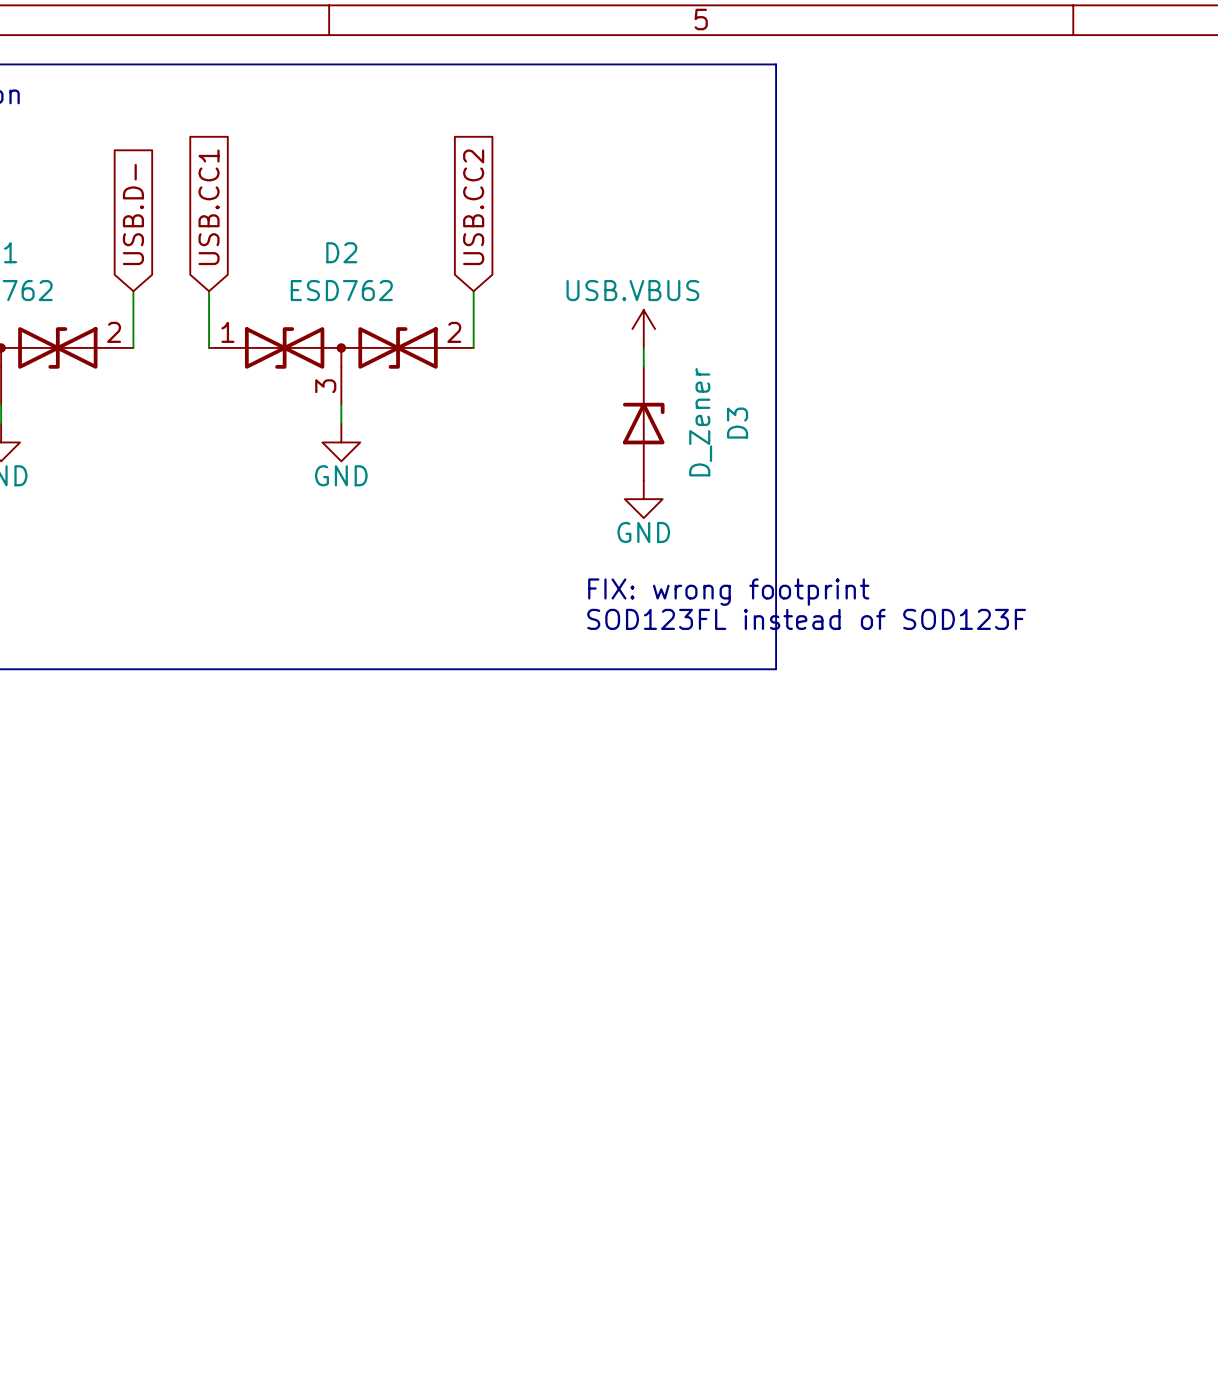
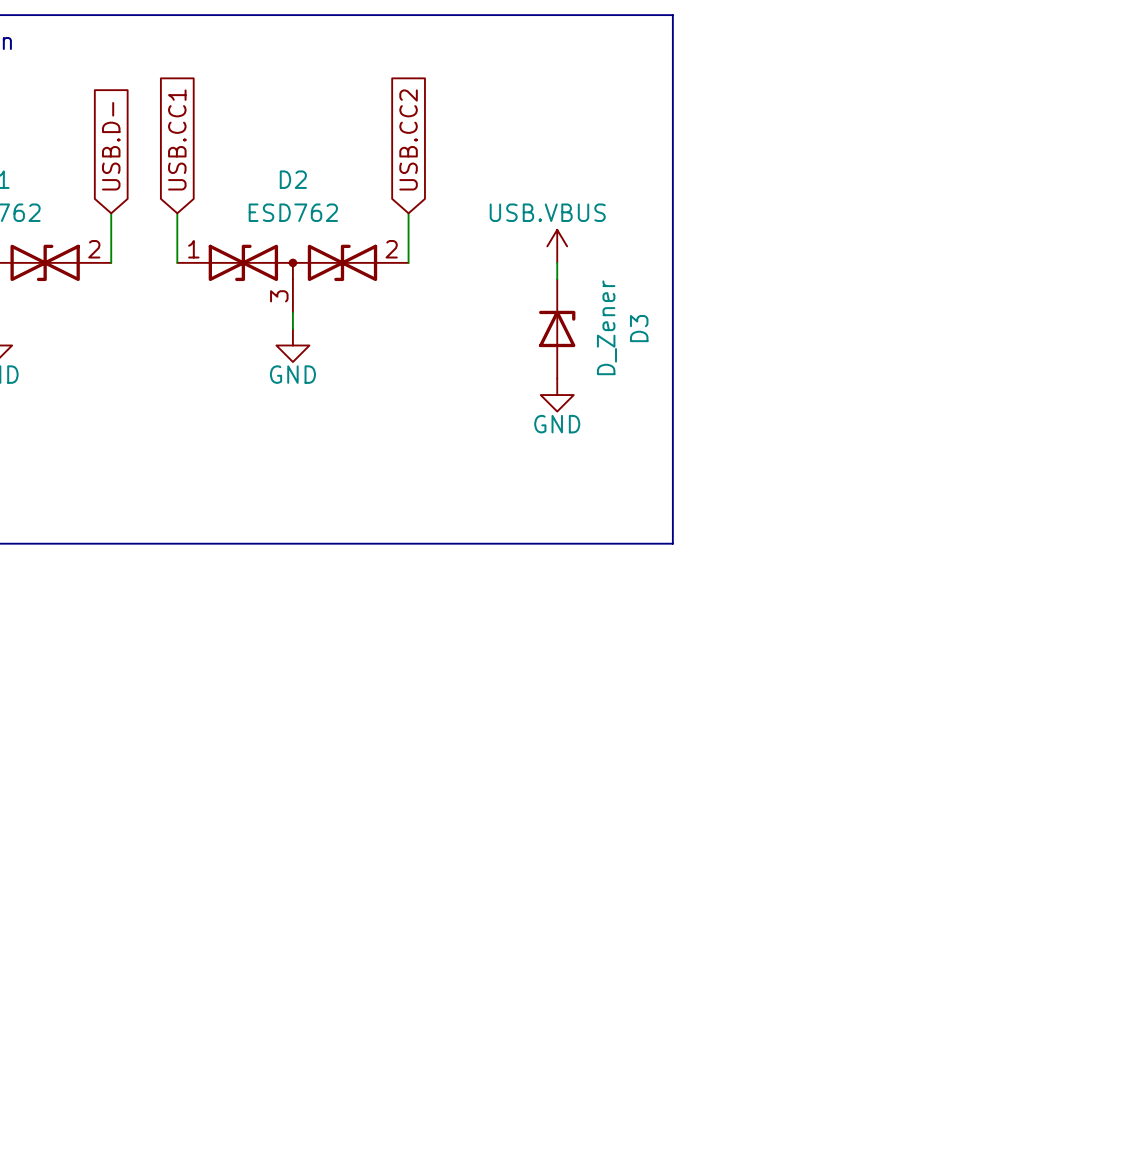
text: FIX: wrong footprint (728, 592) -> none
text: SOD123FL instead of SOD123F (806, 619) -> none

